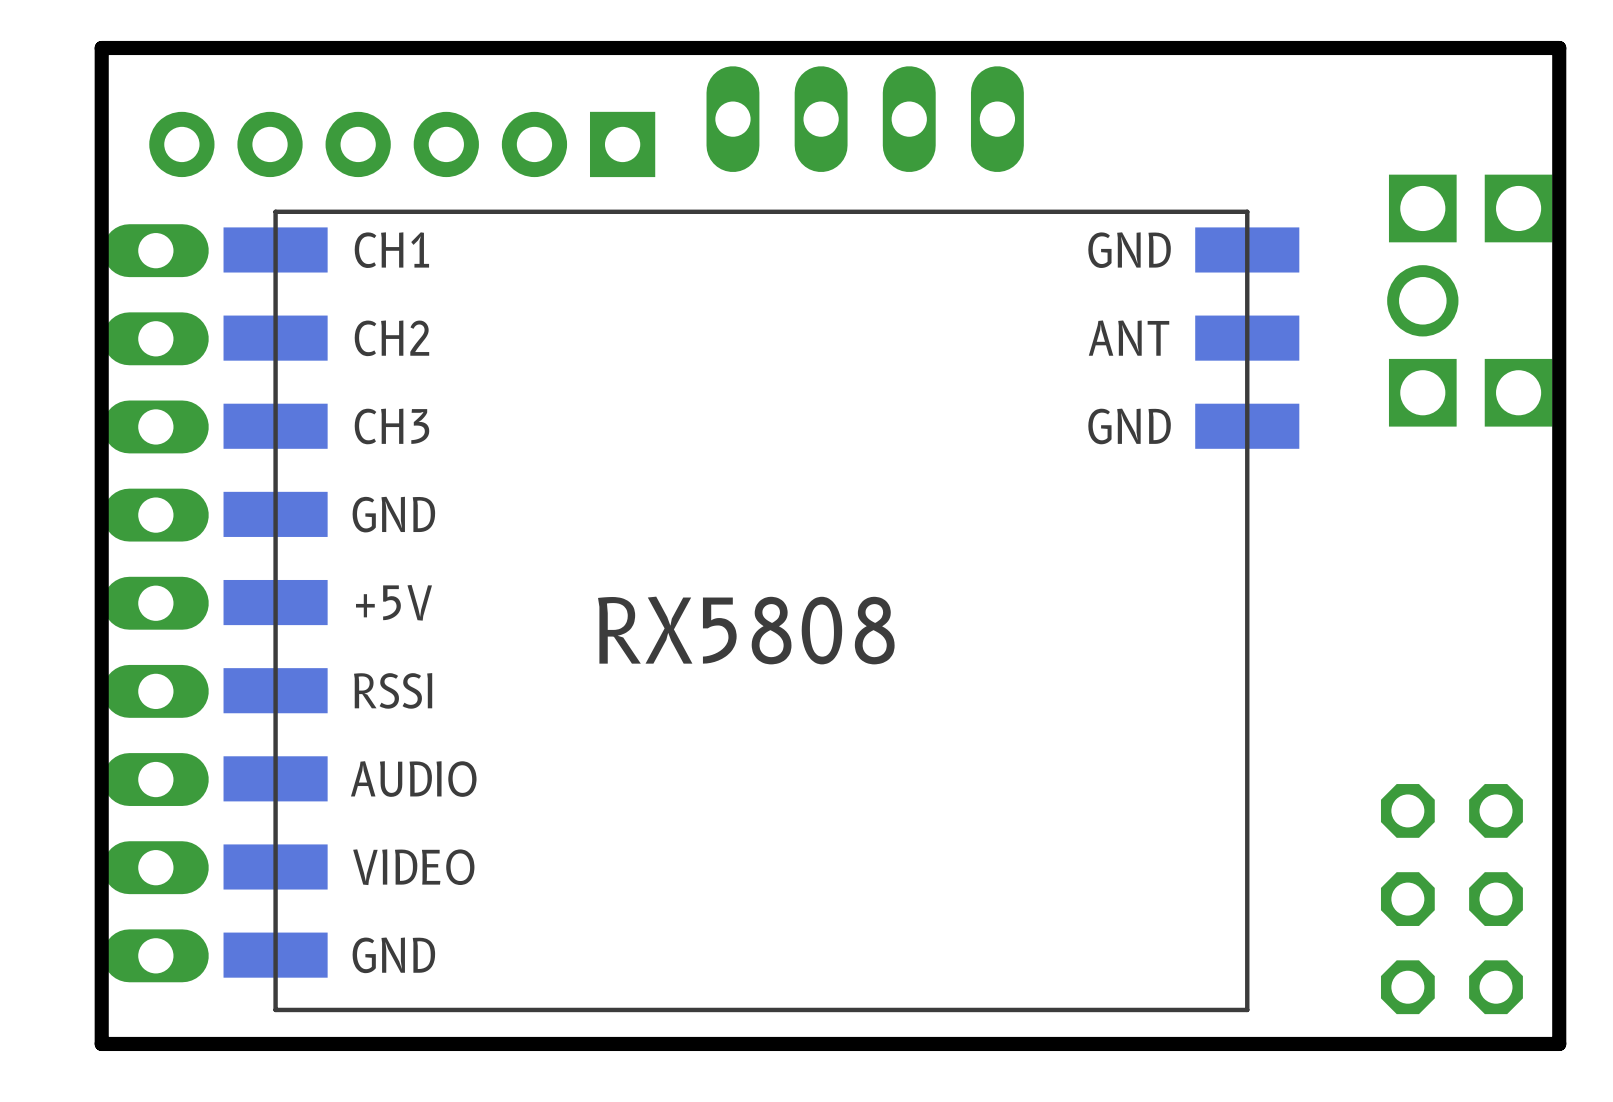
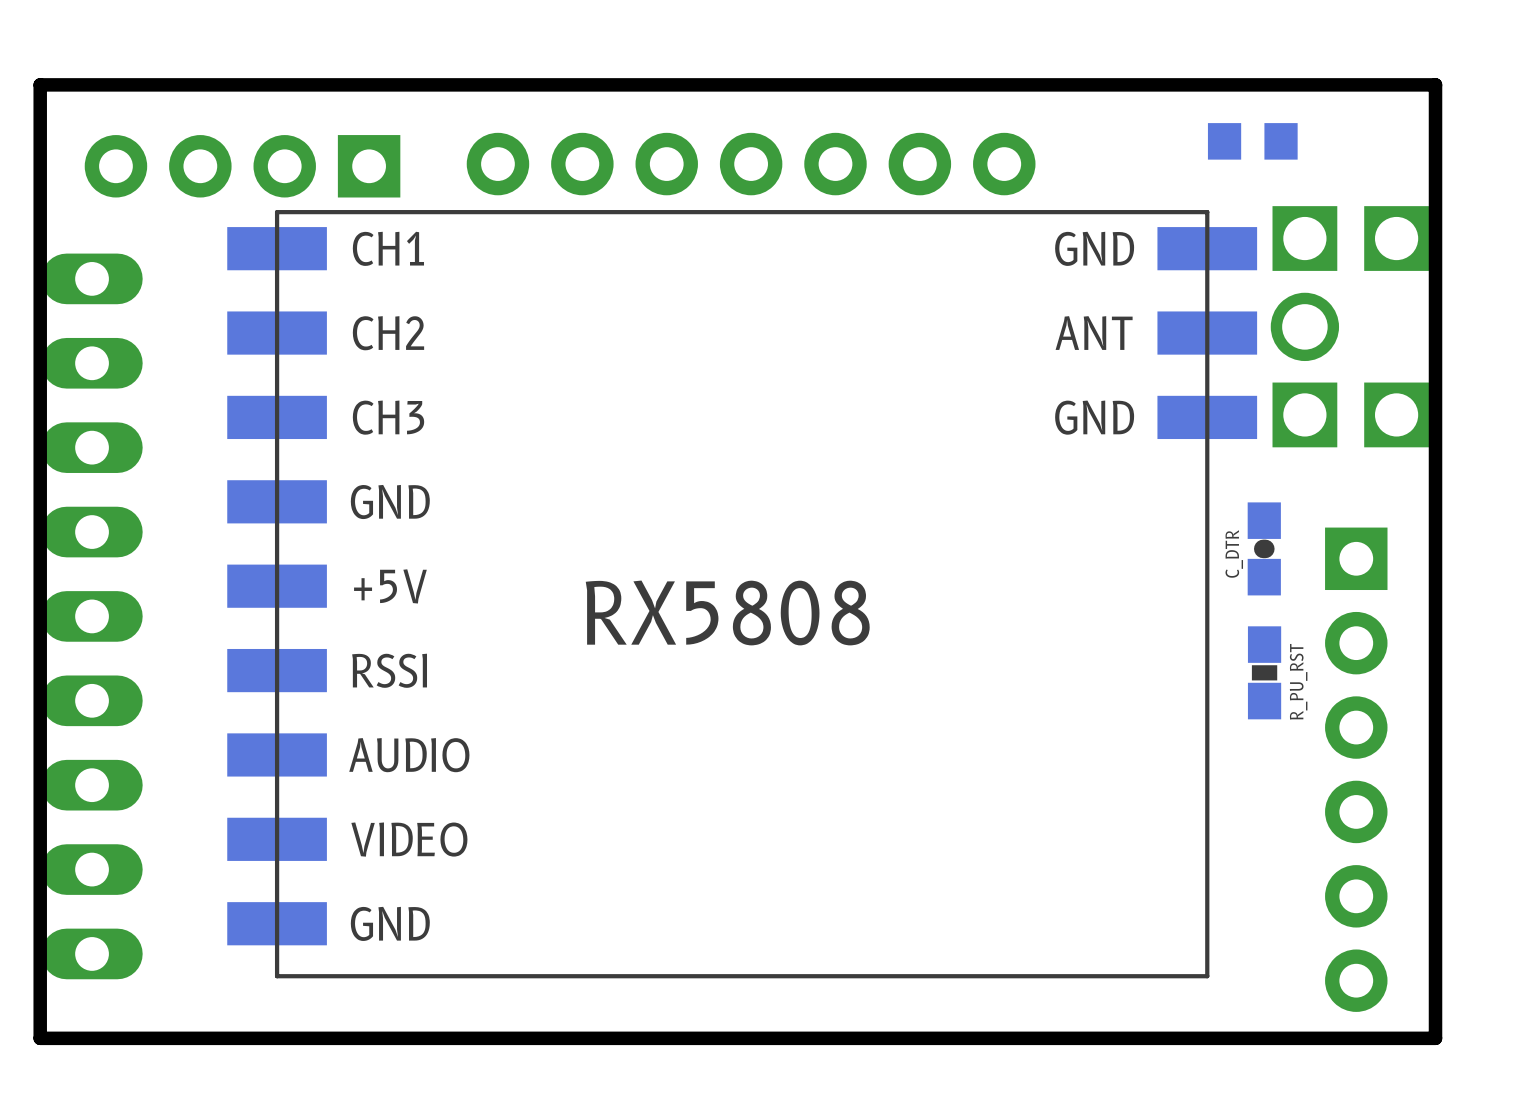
part footprint: [706, 66, 1024, 173] -> [466, 132, 1036, 196]
part: none -> (1252, 141)
part: none -> (242, 166)
part: (402, 144) -> none
C_DTR: none -> (1264, 548)
part position: (761, 610) -> (742, 594)
R_PU_RST: none -> (1264, 672)
part: none -> (1356, 769)
part: (1451, 899) -> none

